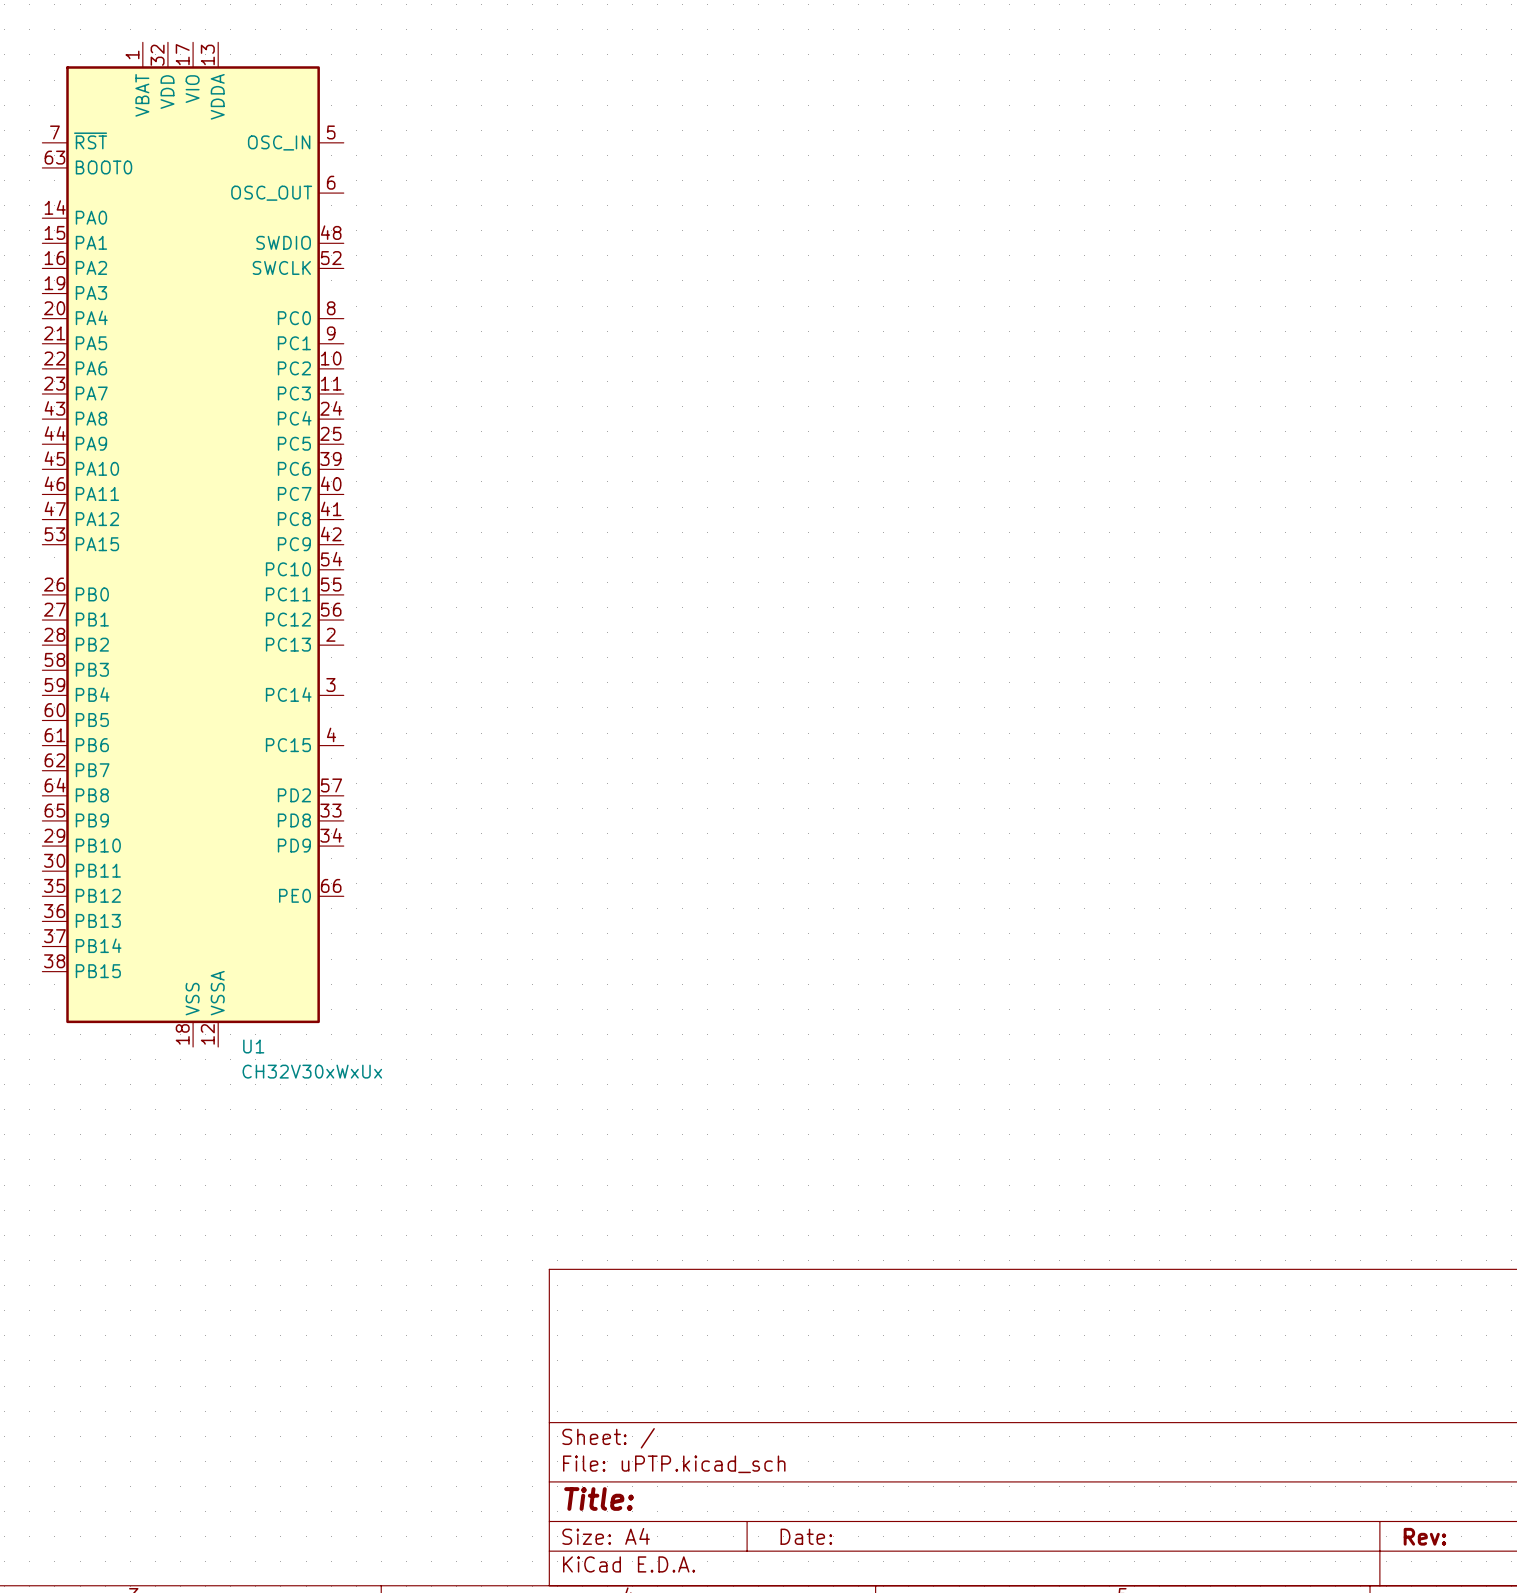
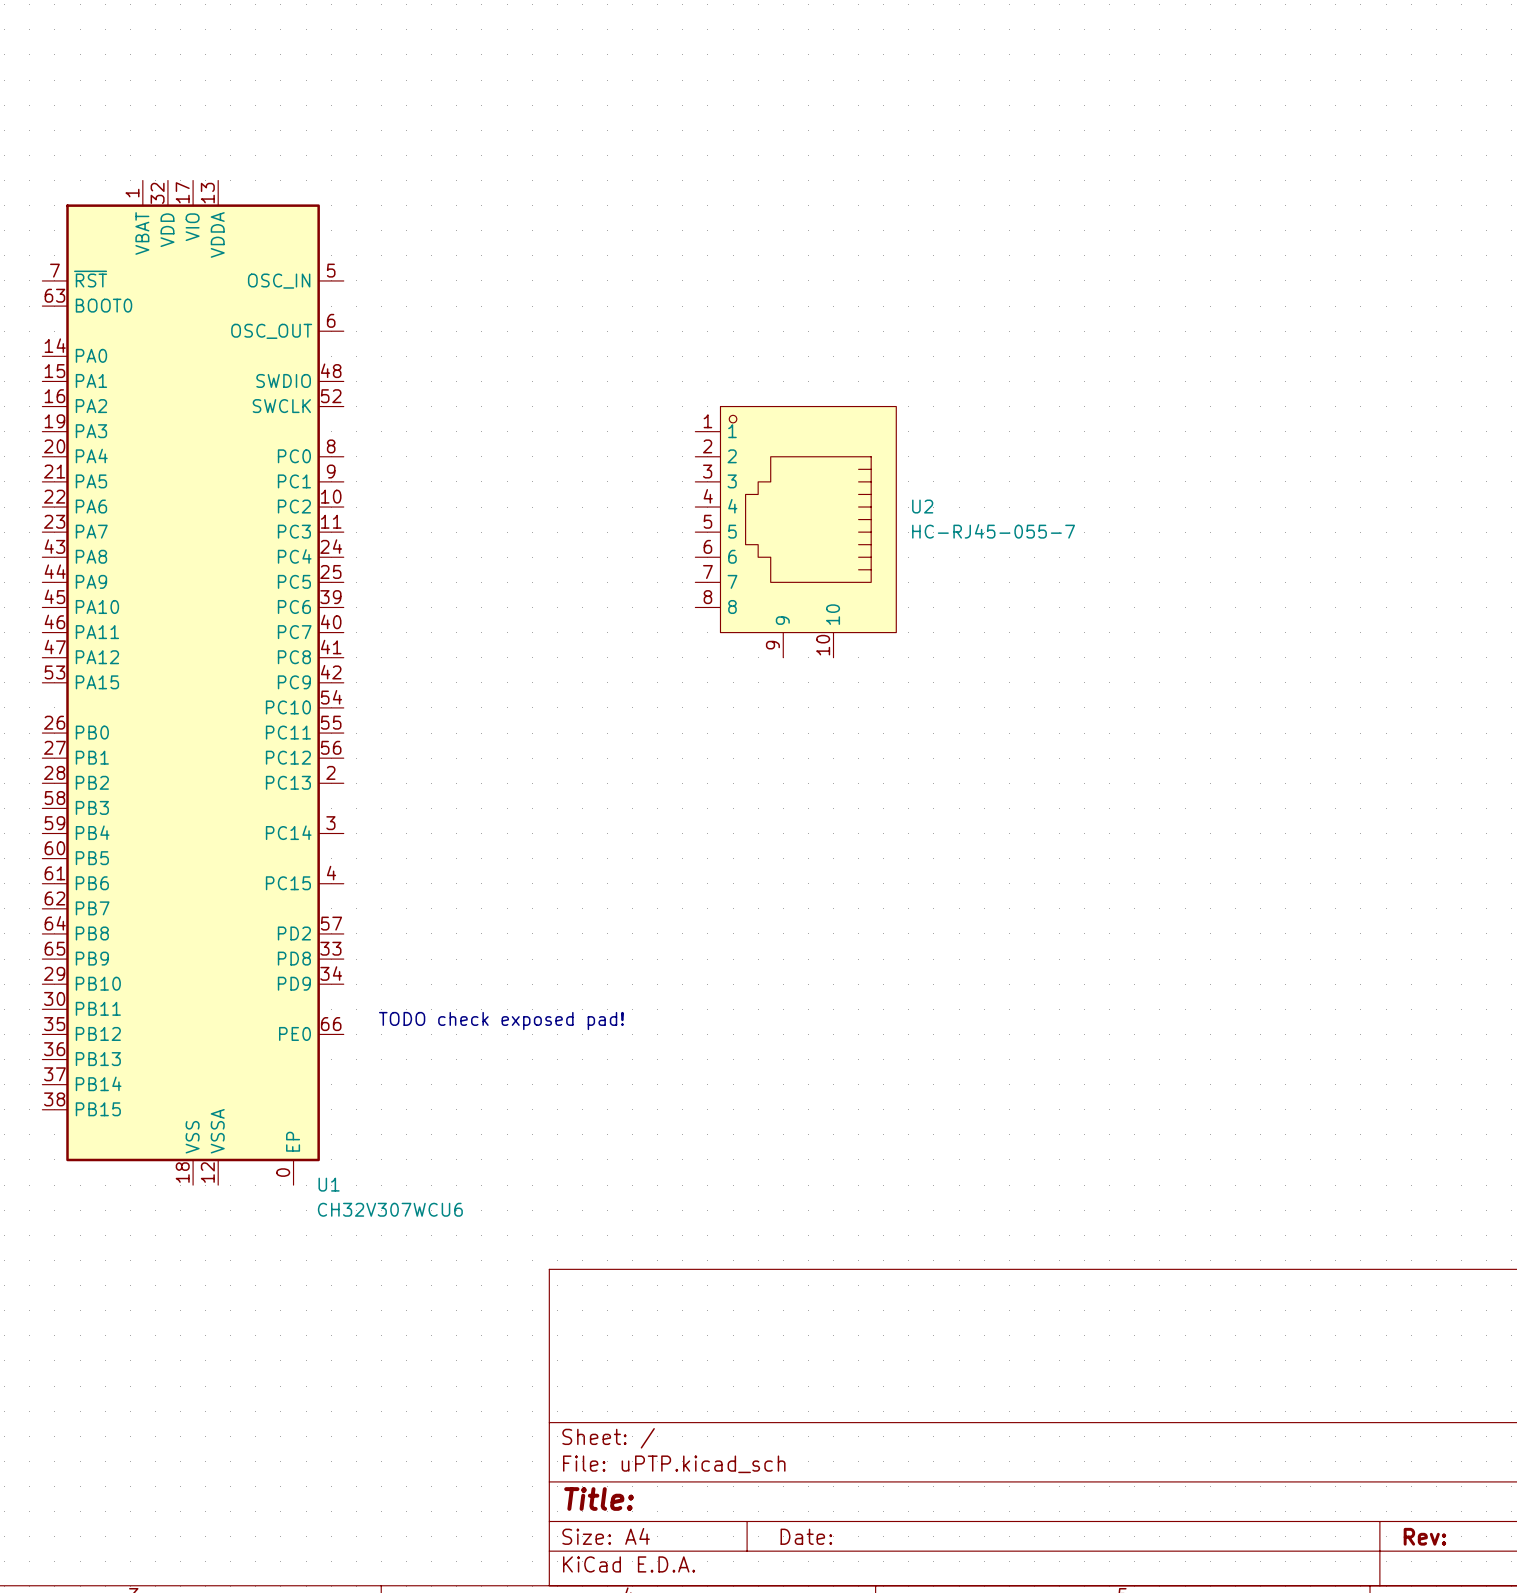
U1 symbol: [42, 42, 344, 1047] -> [42, 180, 344, 1186]
U2: none -> HC-RJ45-055-7 (795, 532)
text: none -> TODO check exposed pad! (501, 1021)
U1 name position: U1 (253, 1046) -> U1 (329, 1184)
U1 value: CH32V30xWxUx (312, 1071) -> CH32V307WCU6 (390, 1209)

